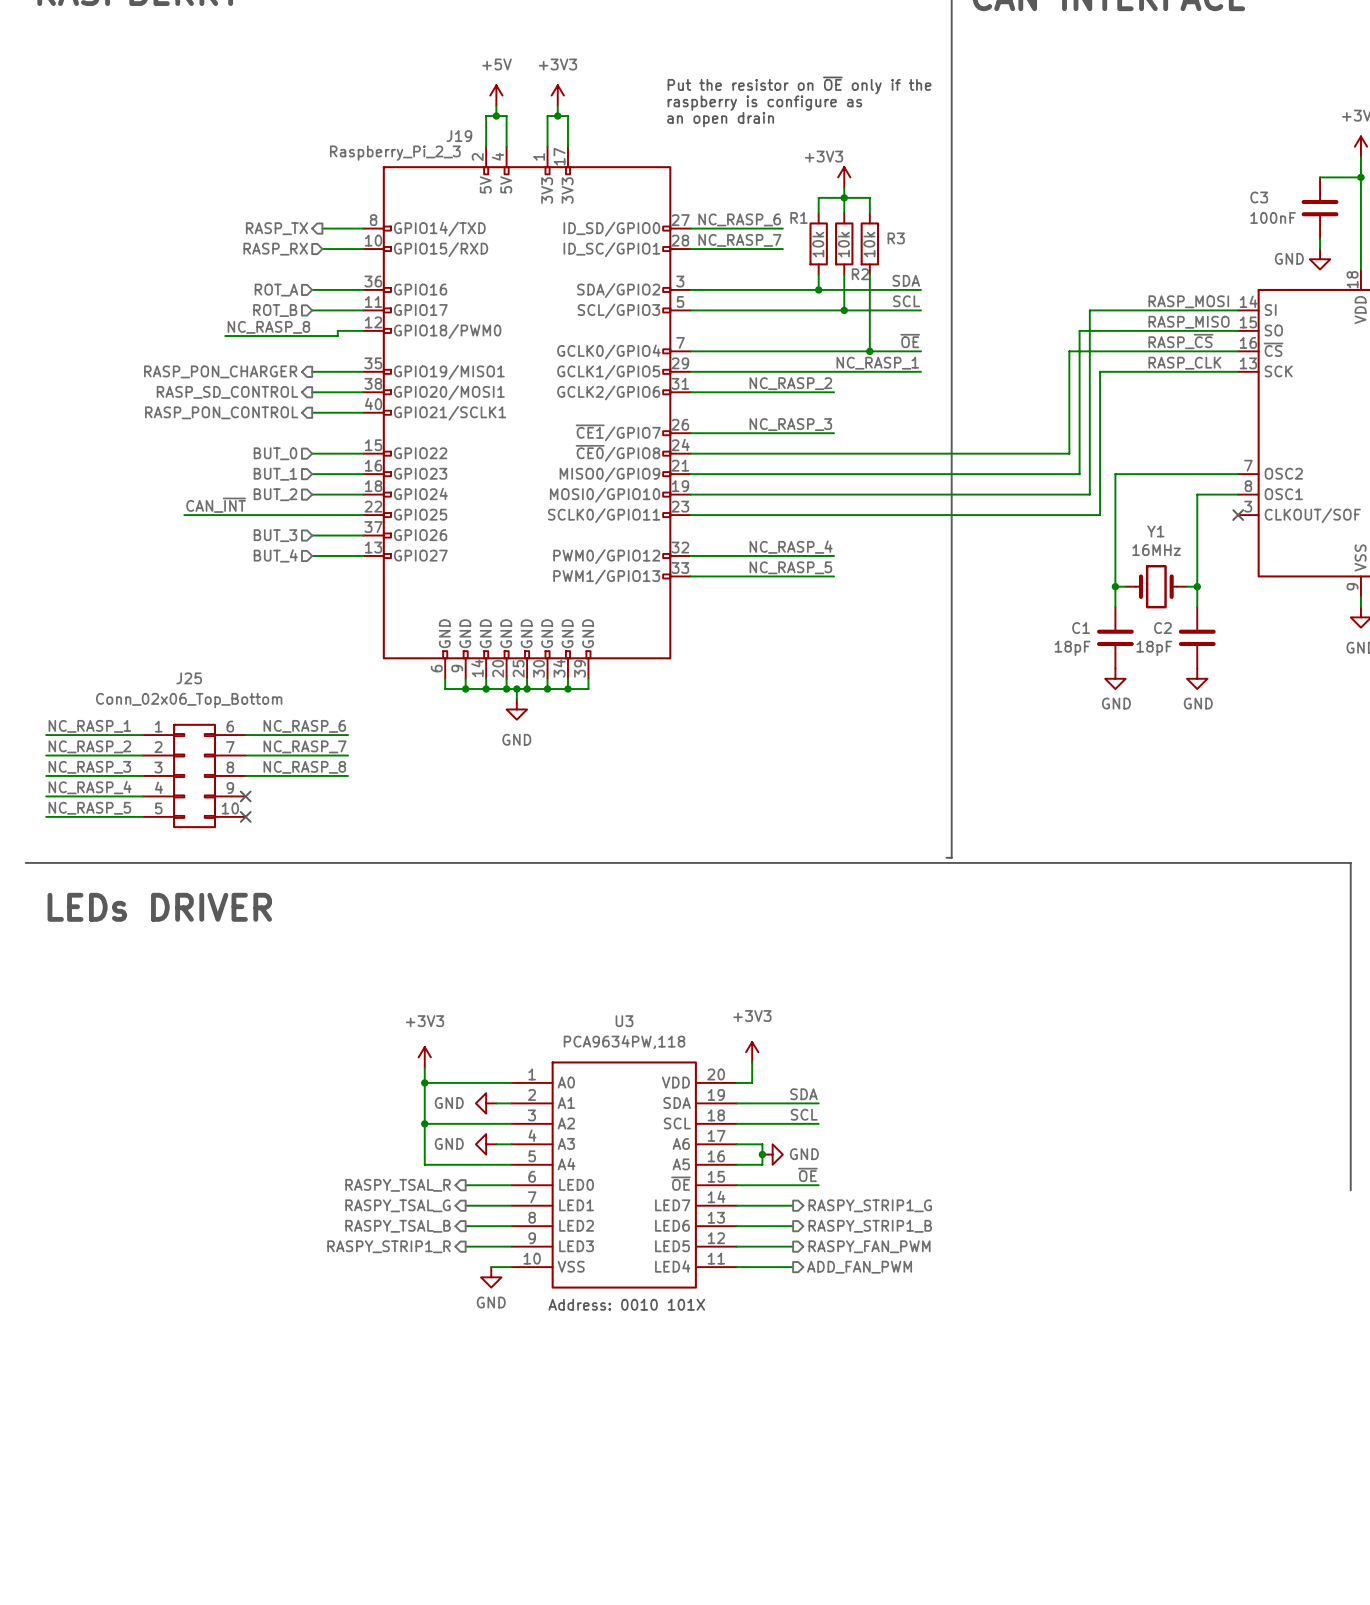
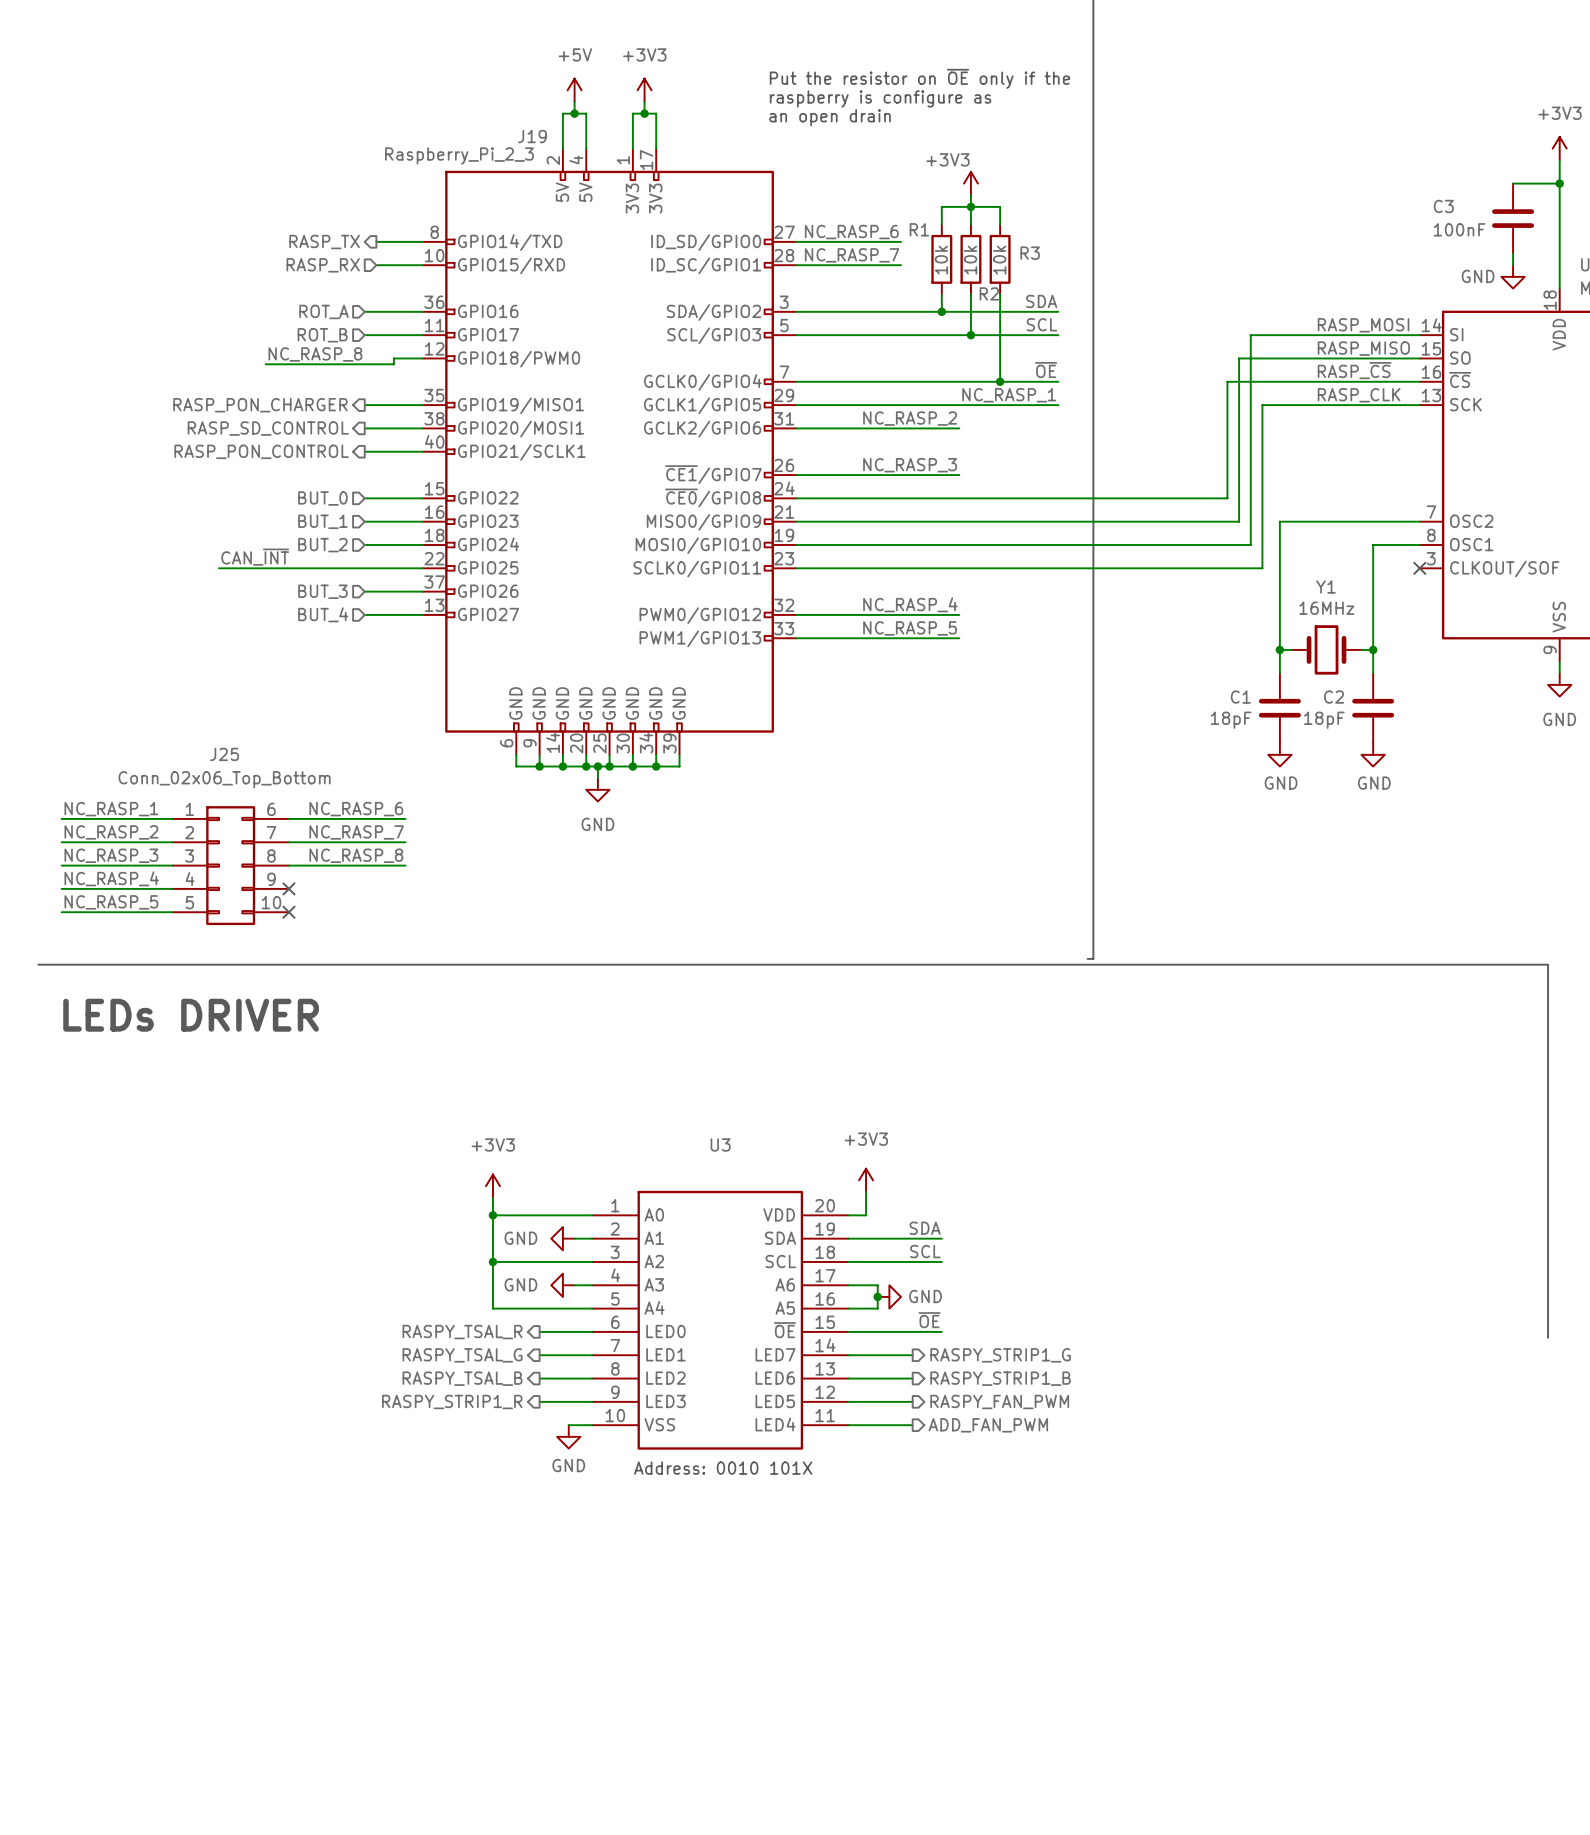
U3 text: PCA9634PW,118 (624, 1042) -> none

